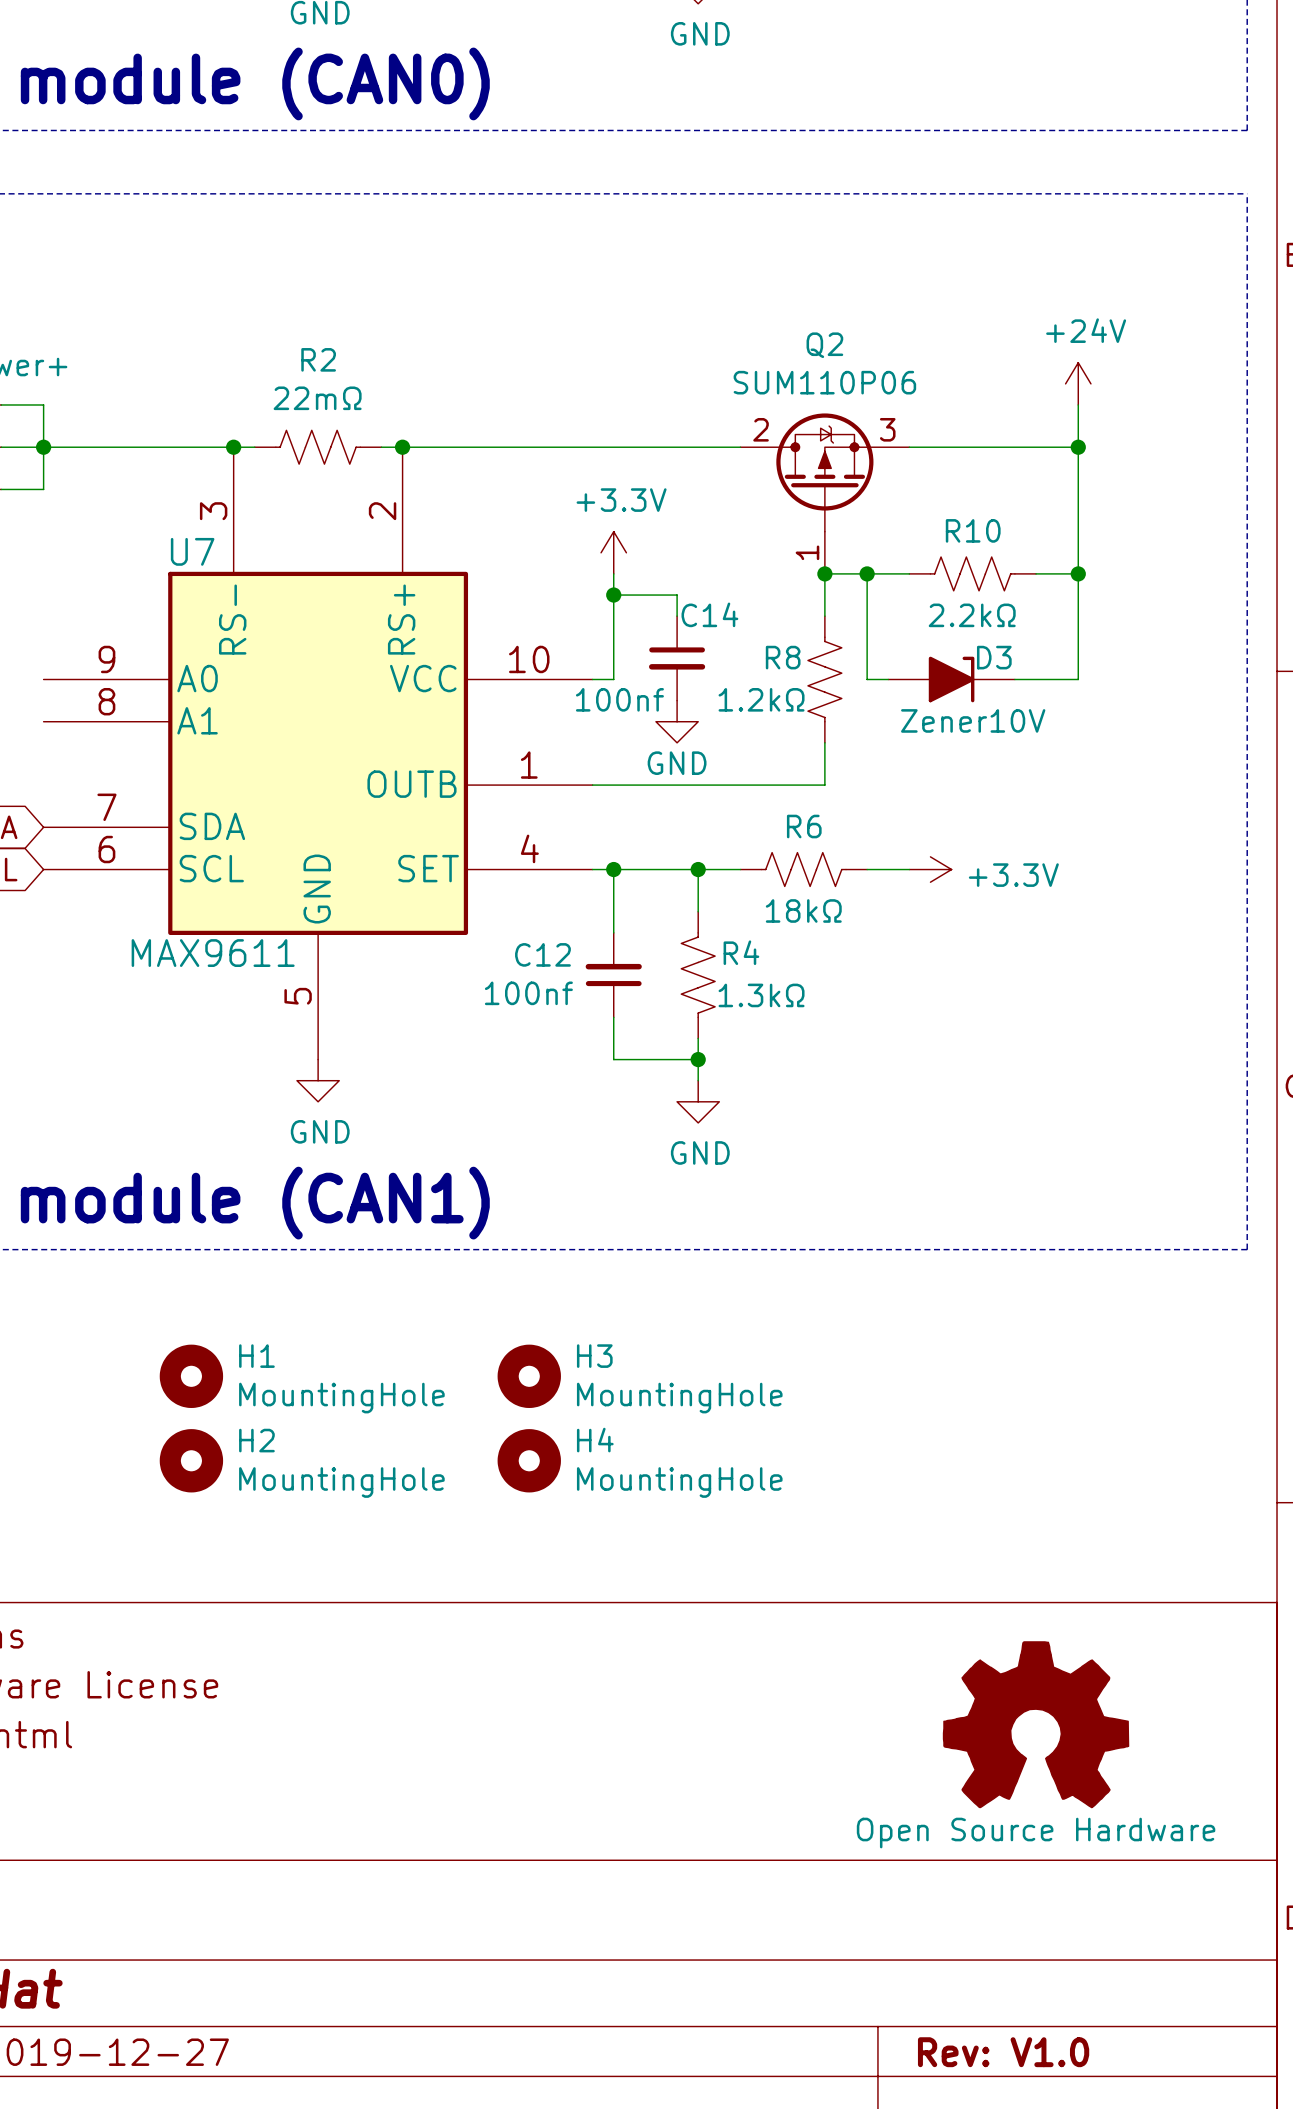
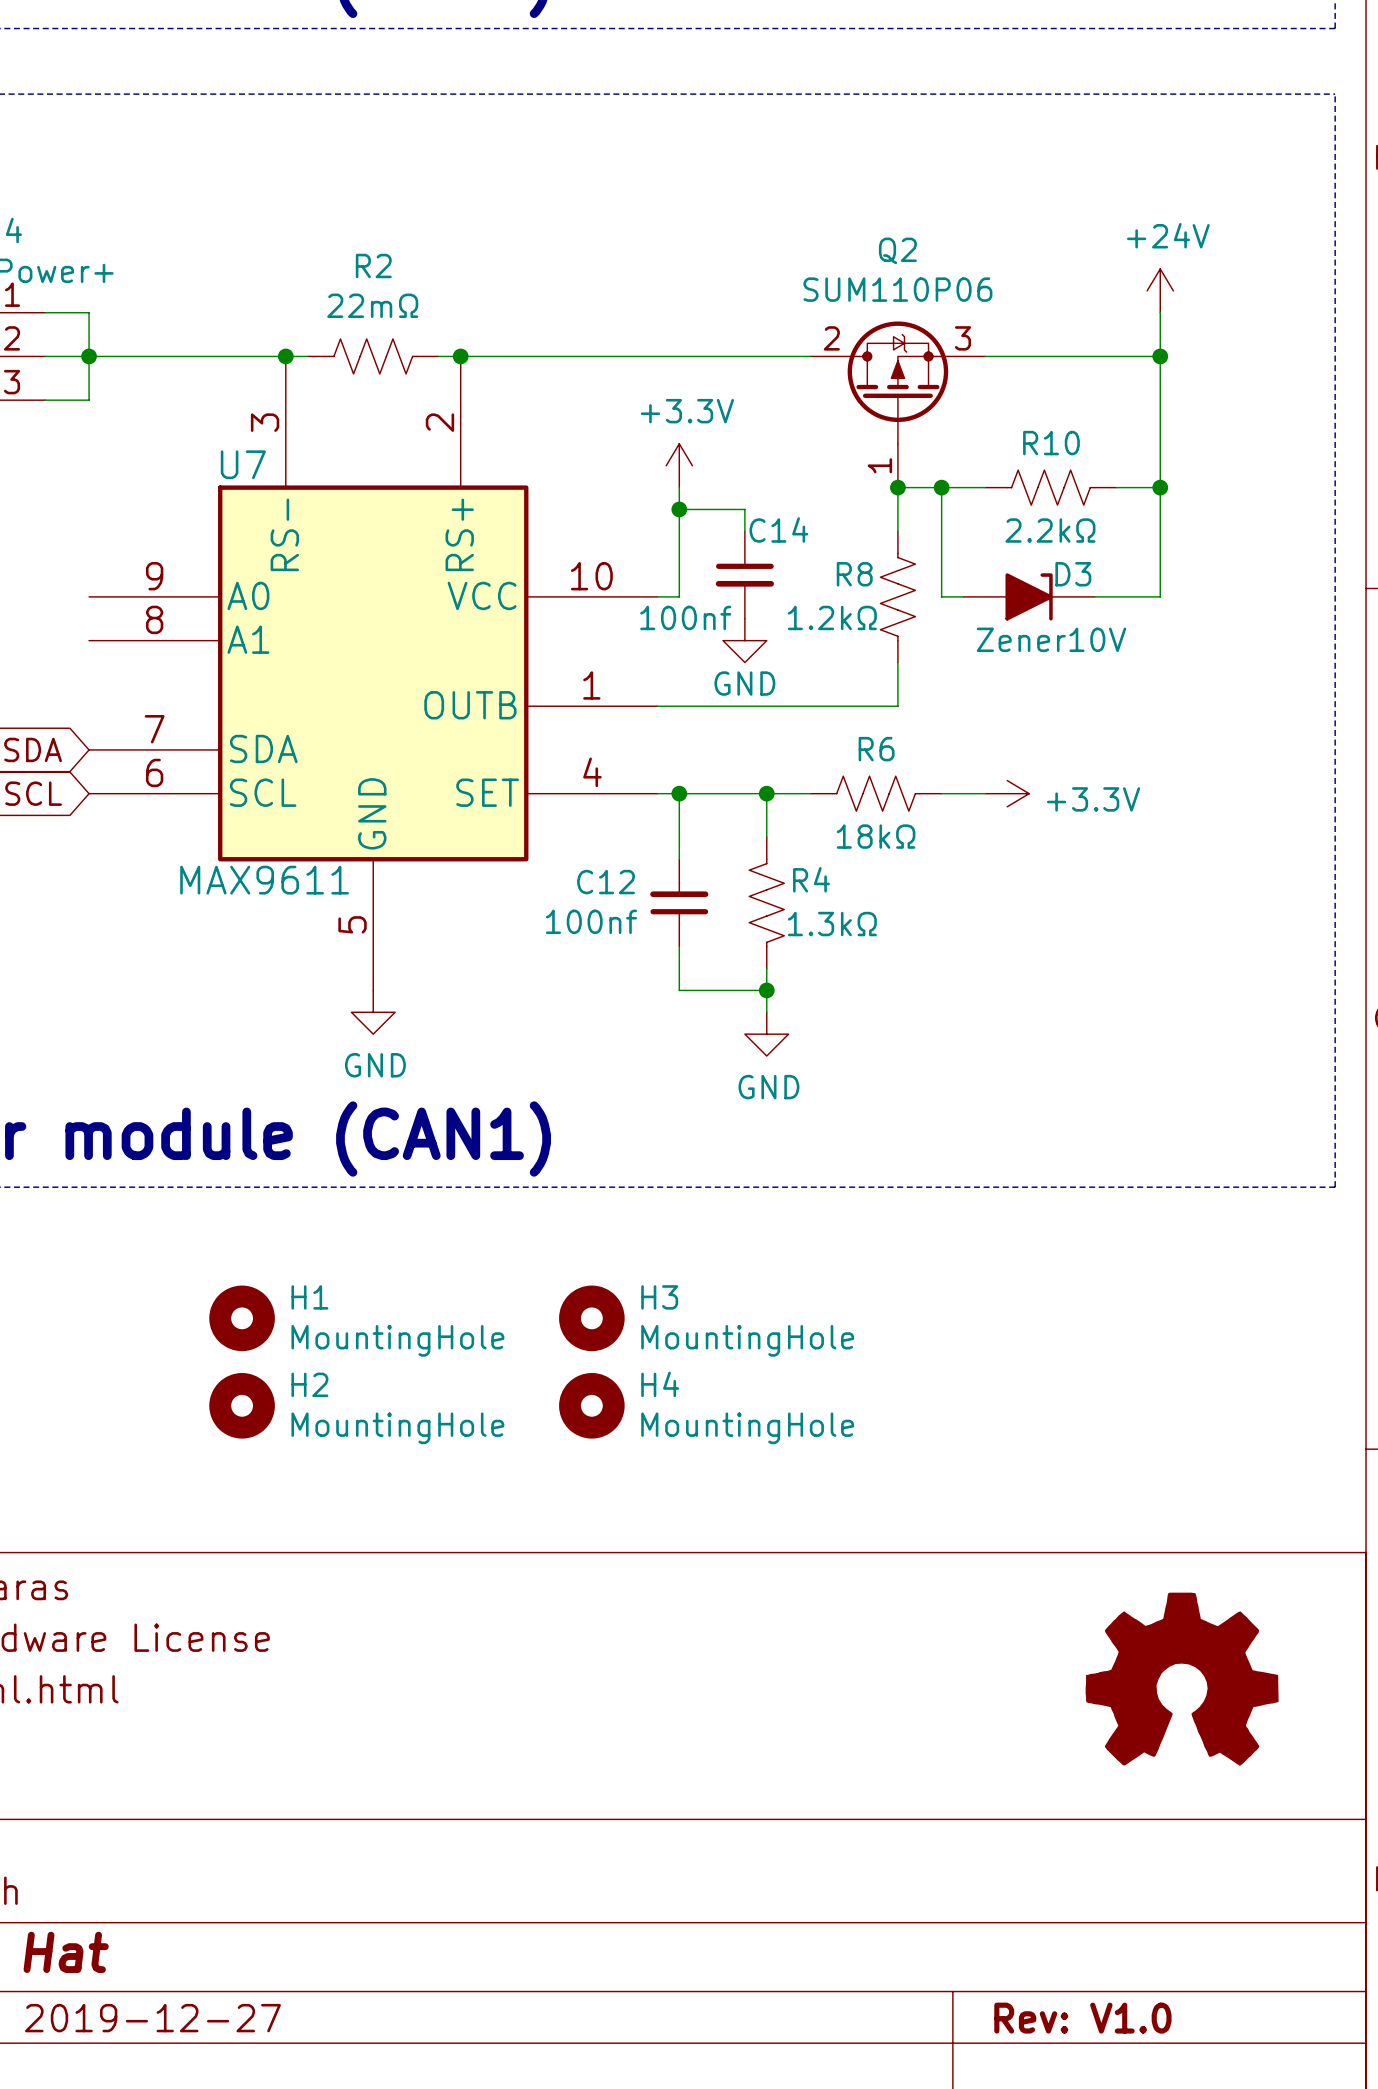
power symbol: Open Source Hardware (1036, 1724) -> none
power symbol: none -> (1182, 1679)

